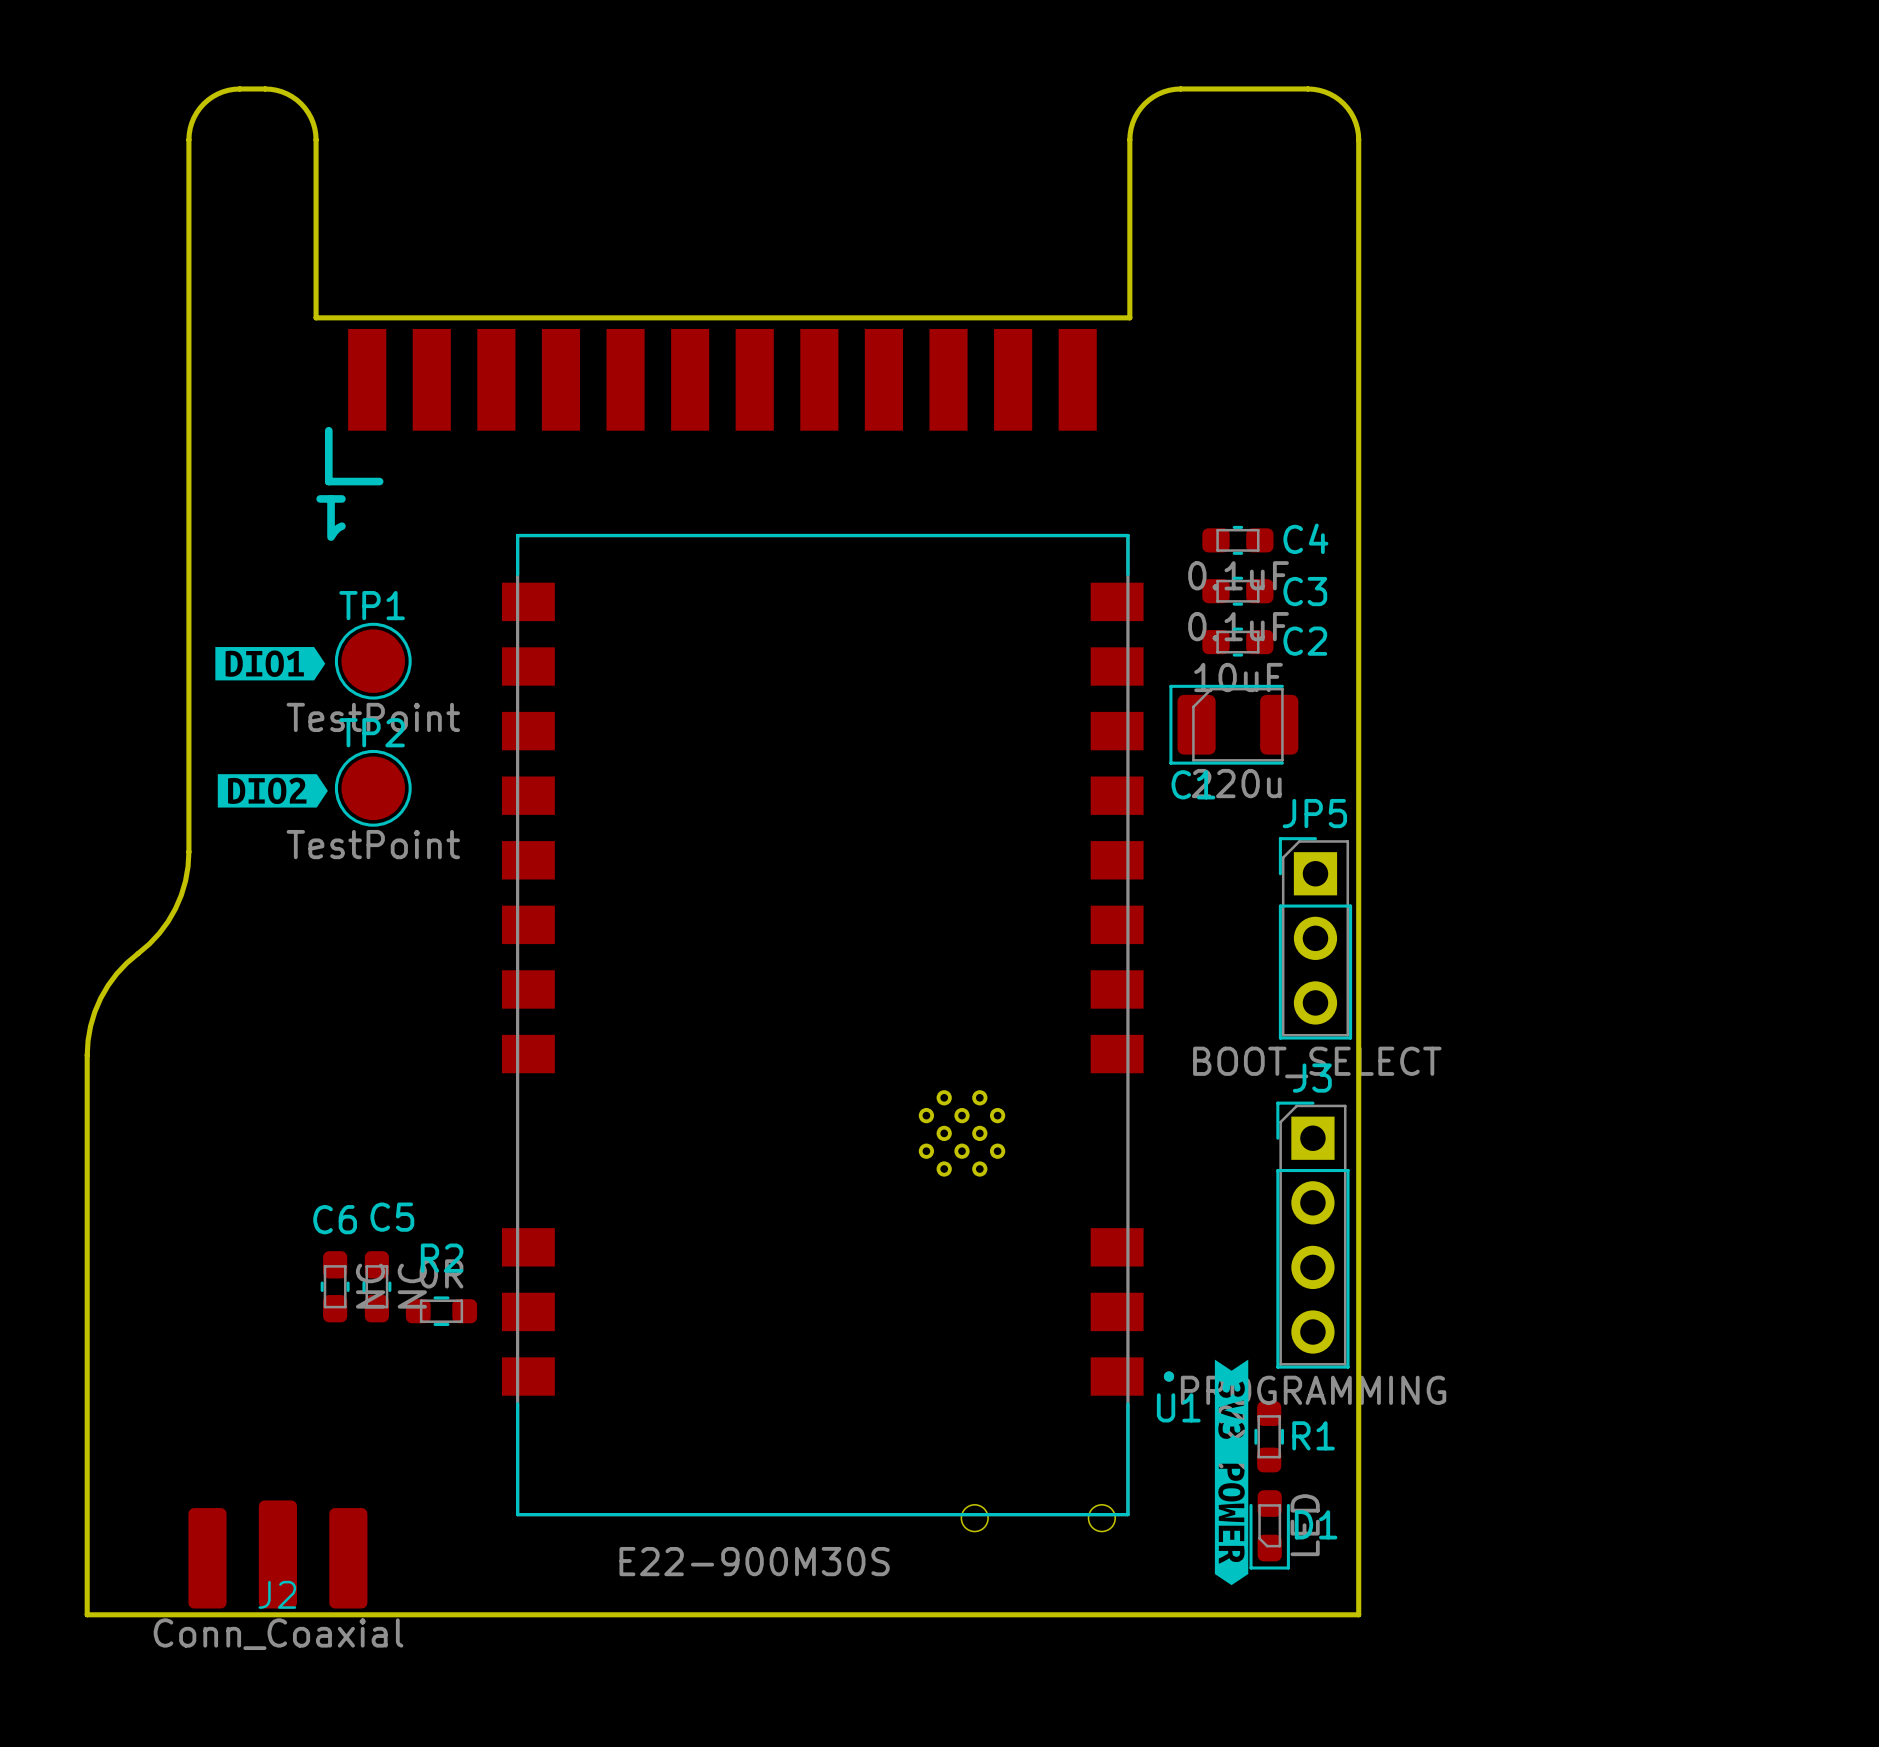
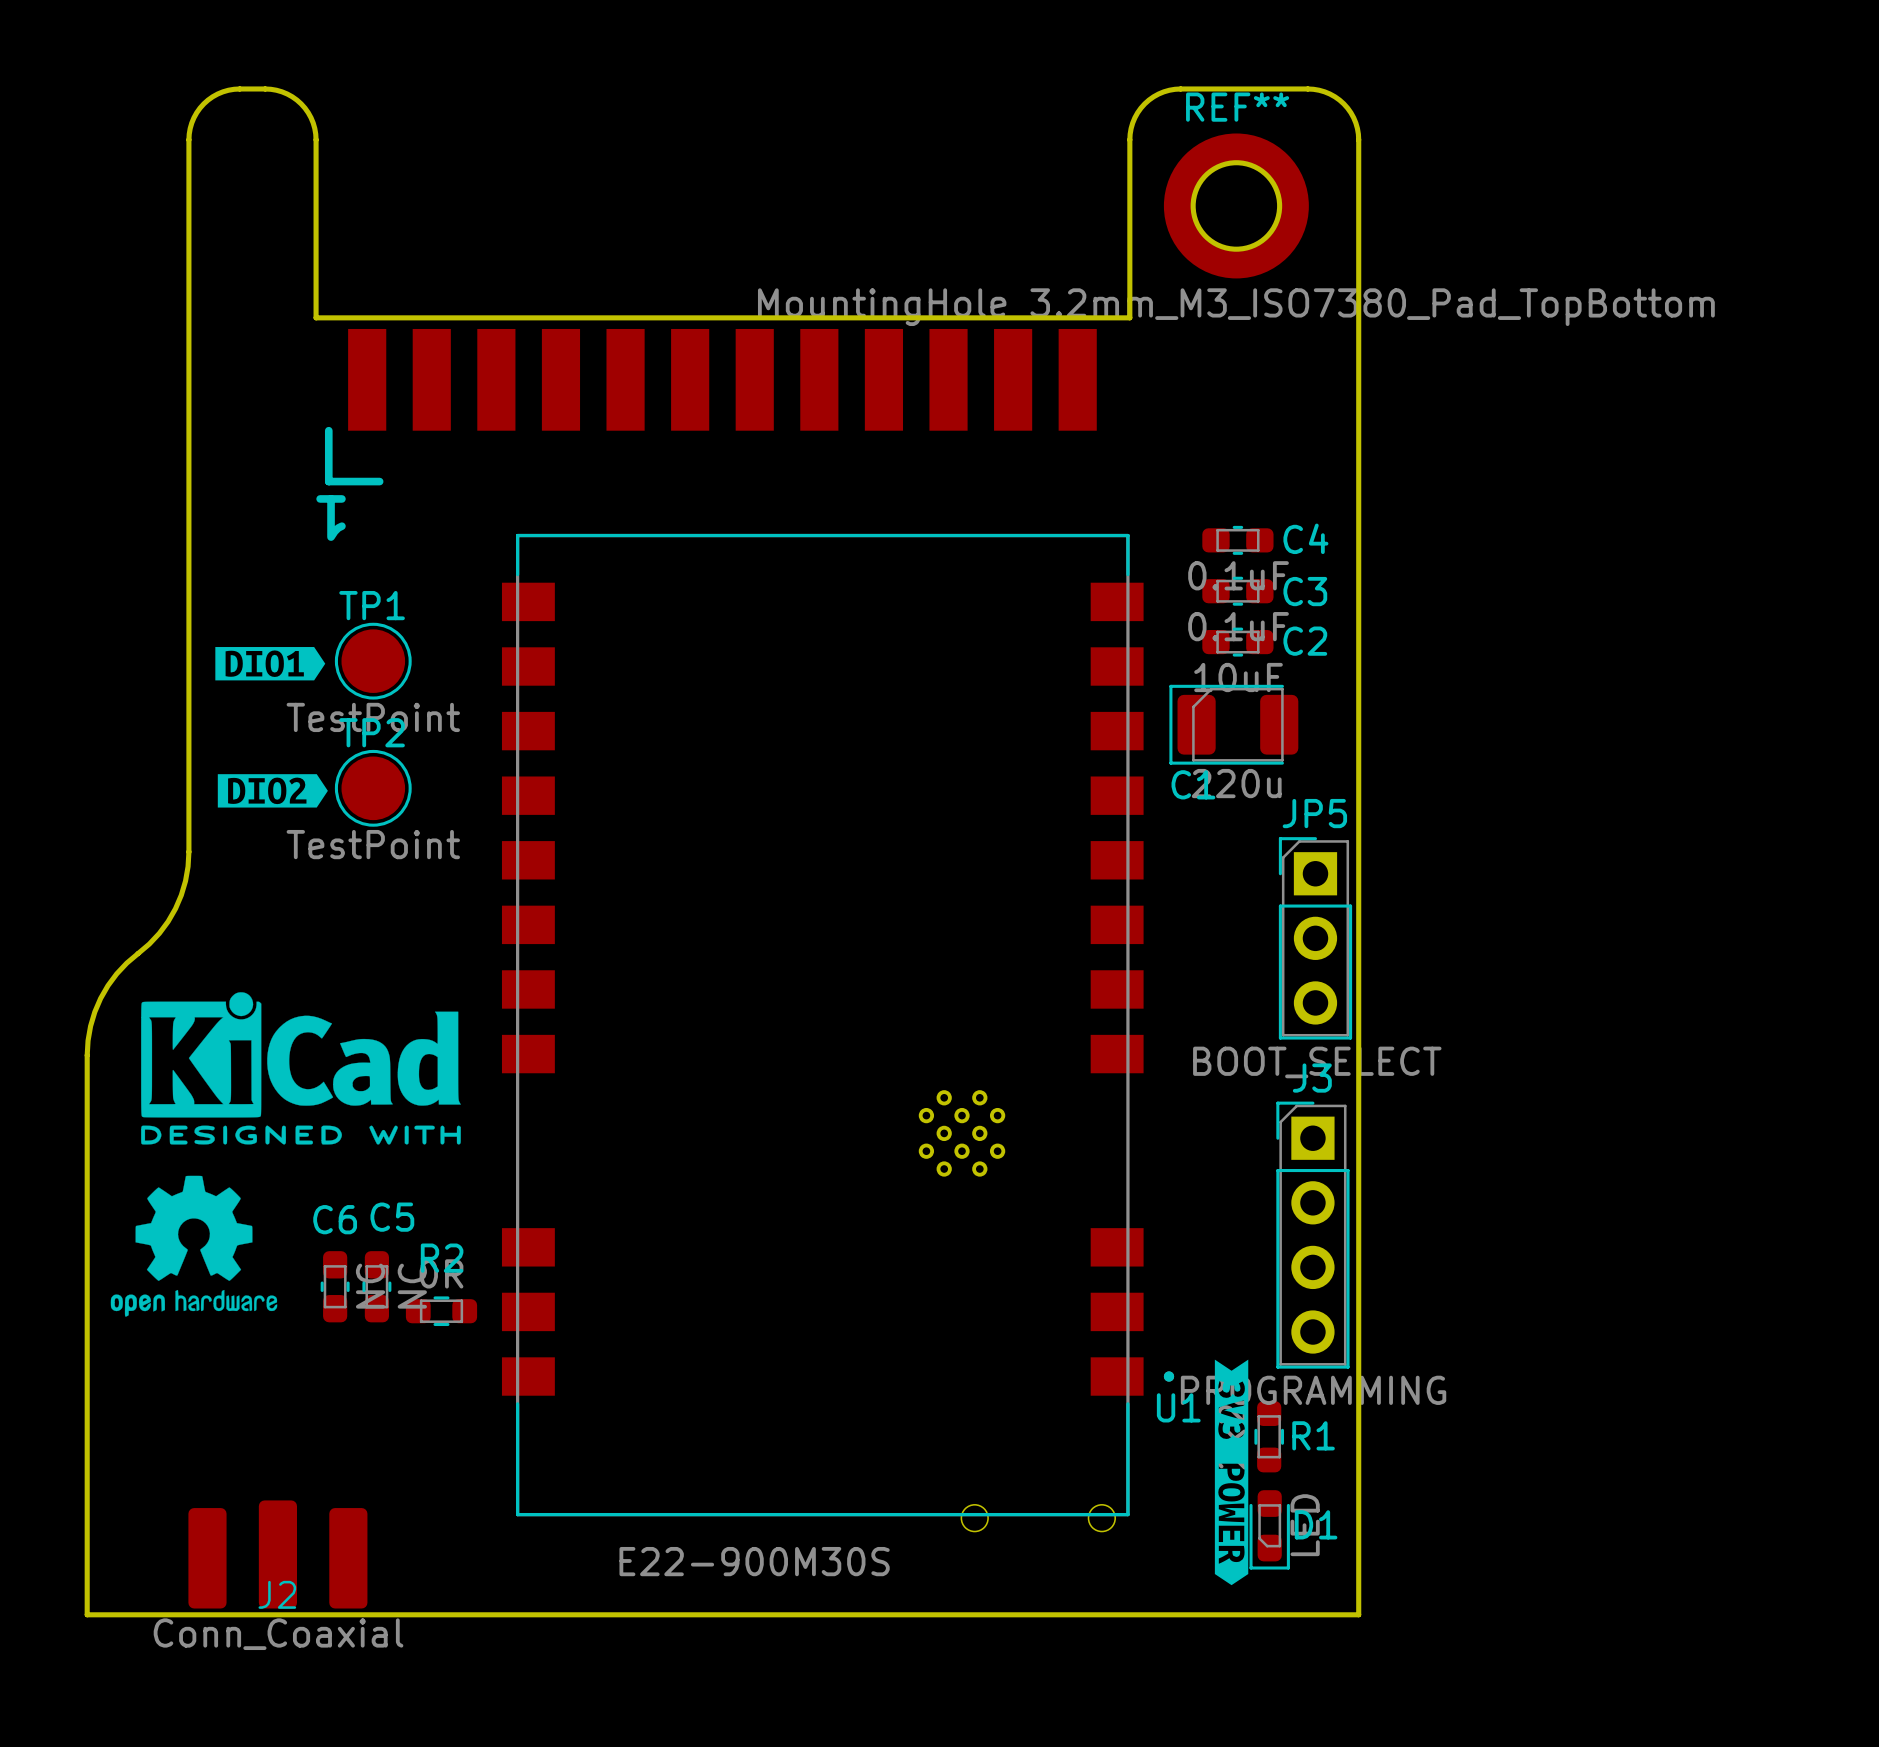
REF**: none -> MountingHole_3.2mm_M3_ISO7380_Pad_TopBottom (1236, 205)
drawing: none -> [141, 992, 461, 1145]
drawing: none -> [110, 1175, 278, 1317]

